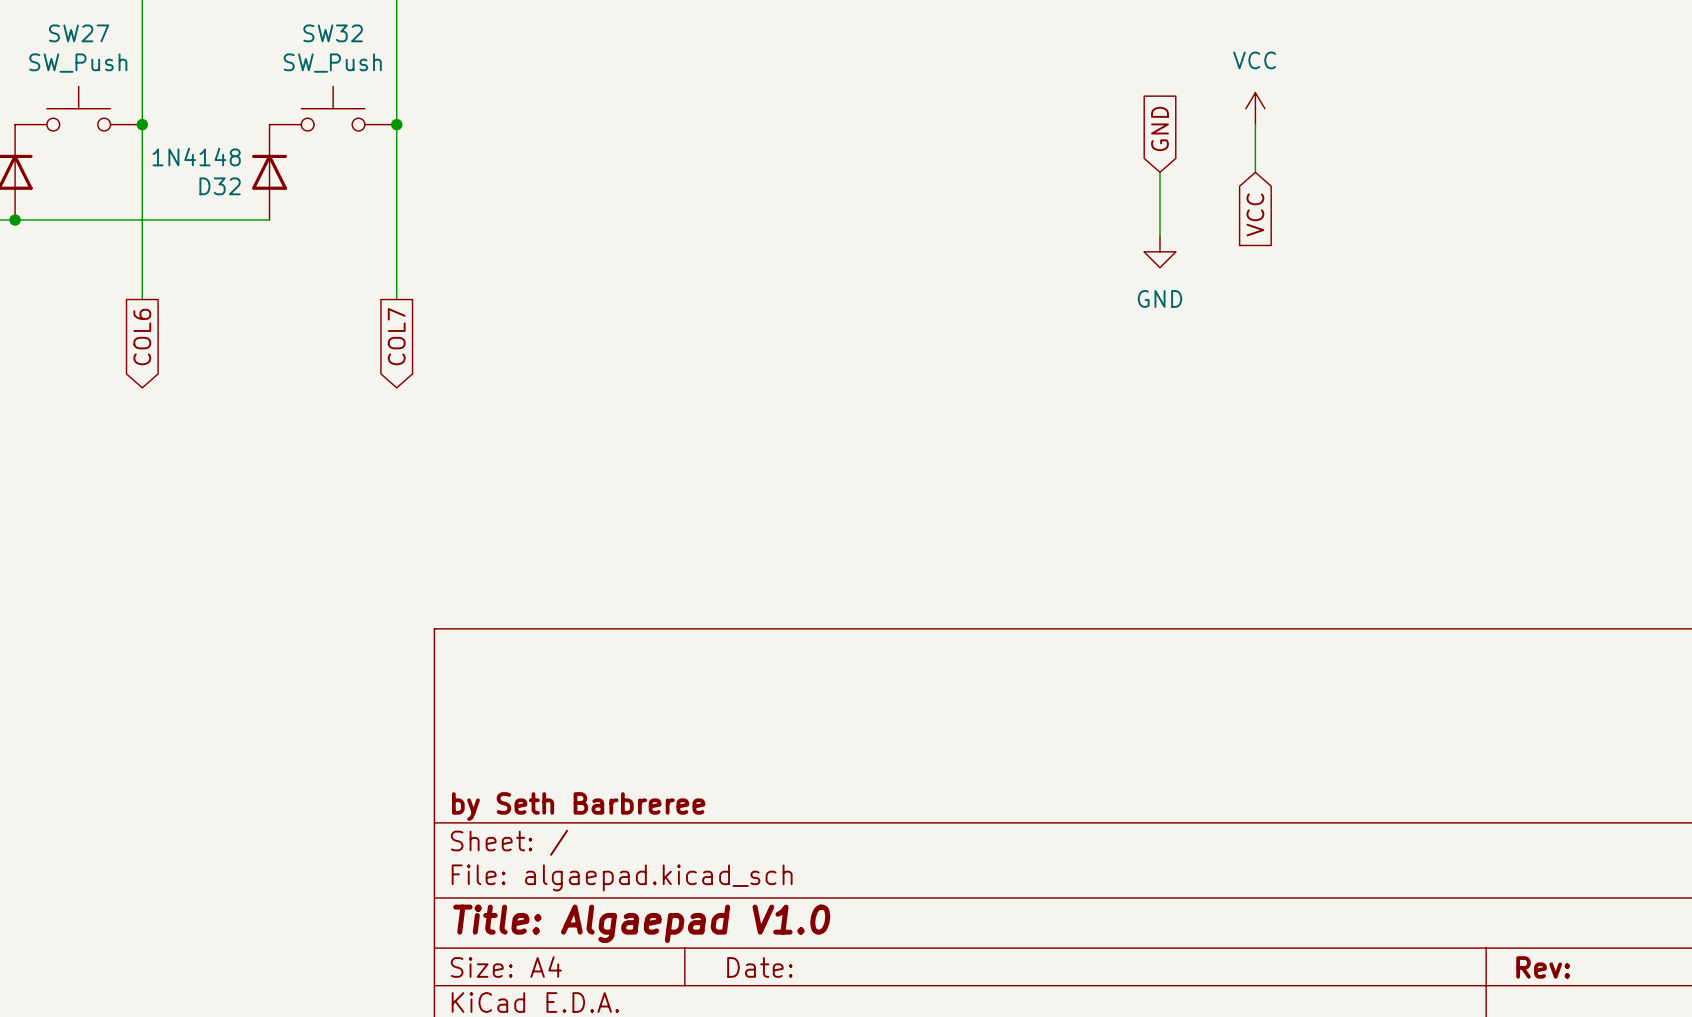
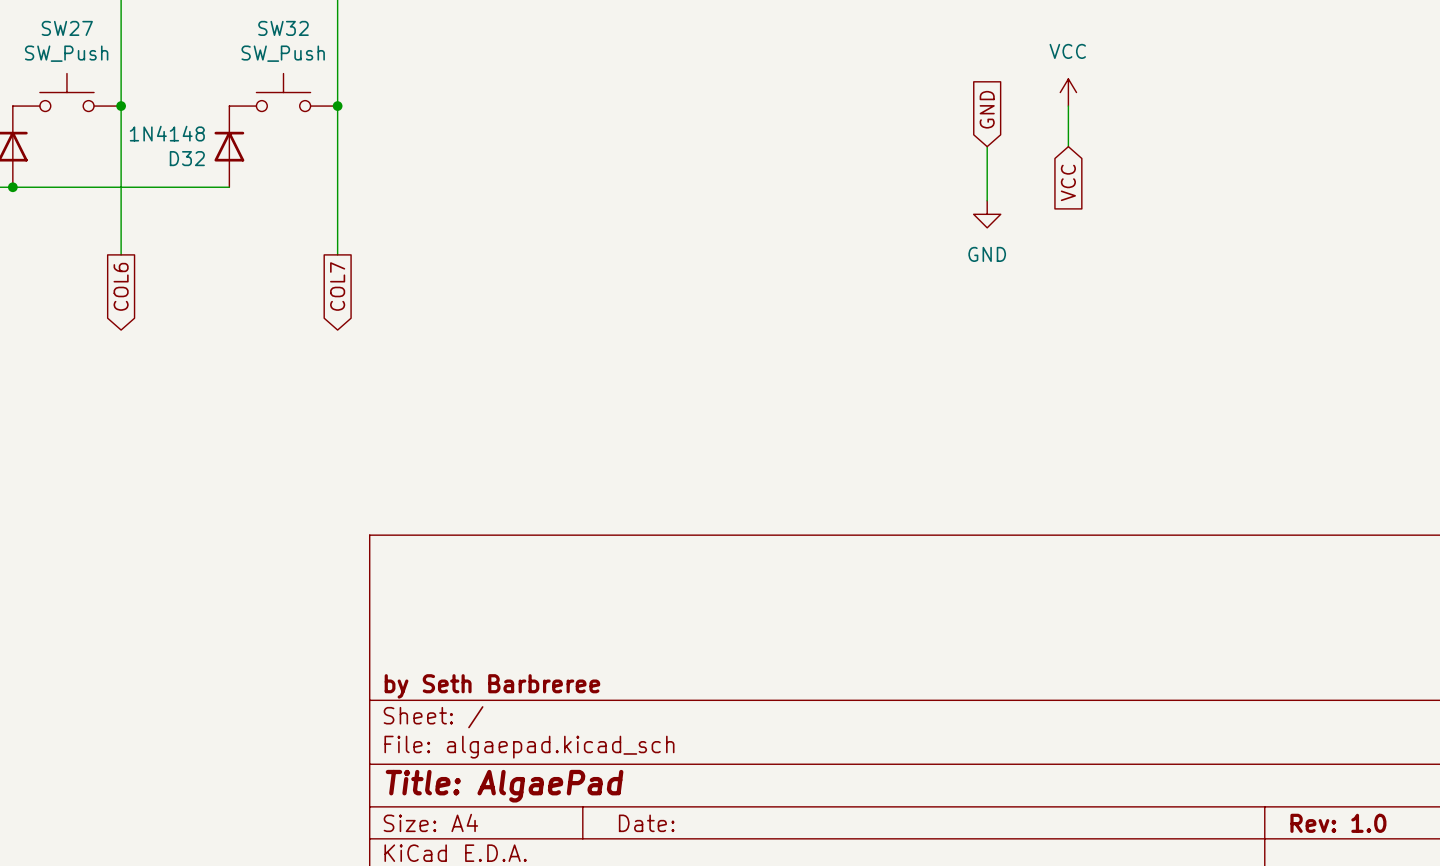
title block: Title: Algaepad V1.0 (641, 923) -> Title: AlgaePad (504, 786)
title block: Rev: (1543, 967) -> Rev: 1.0 (1338, 823)

